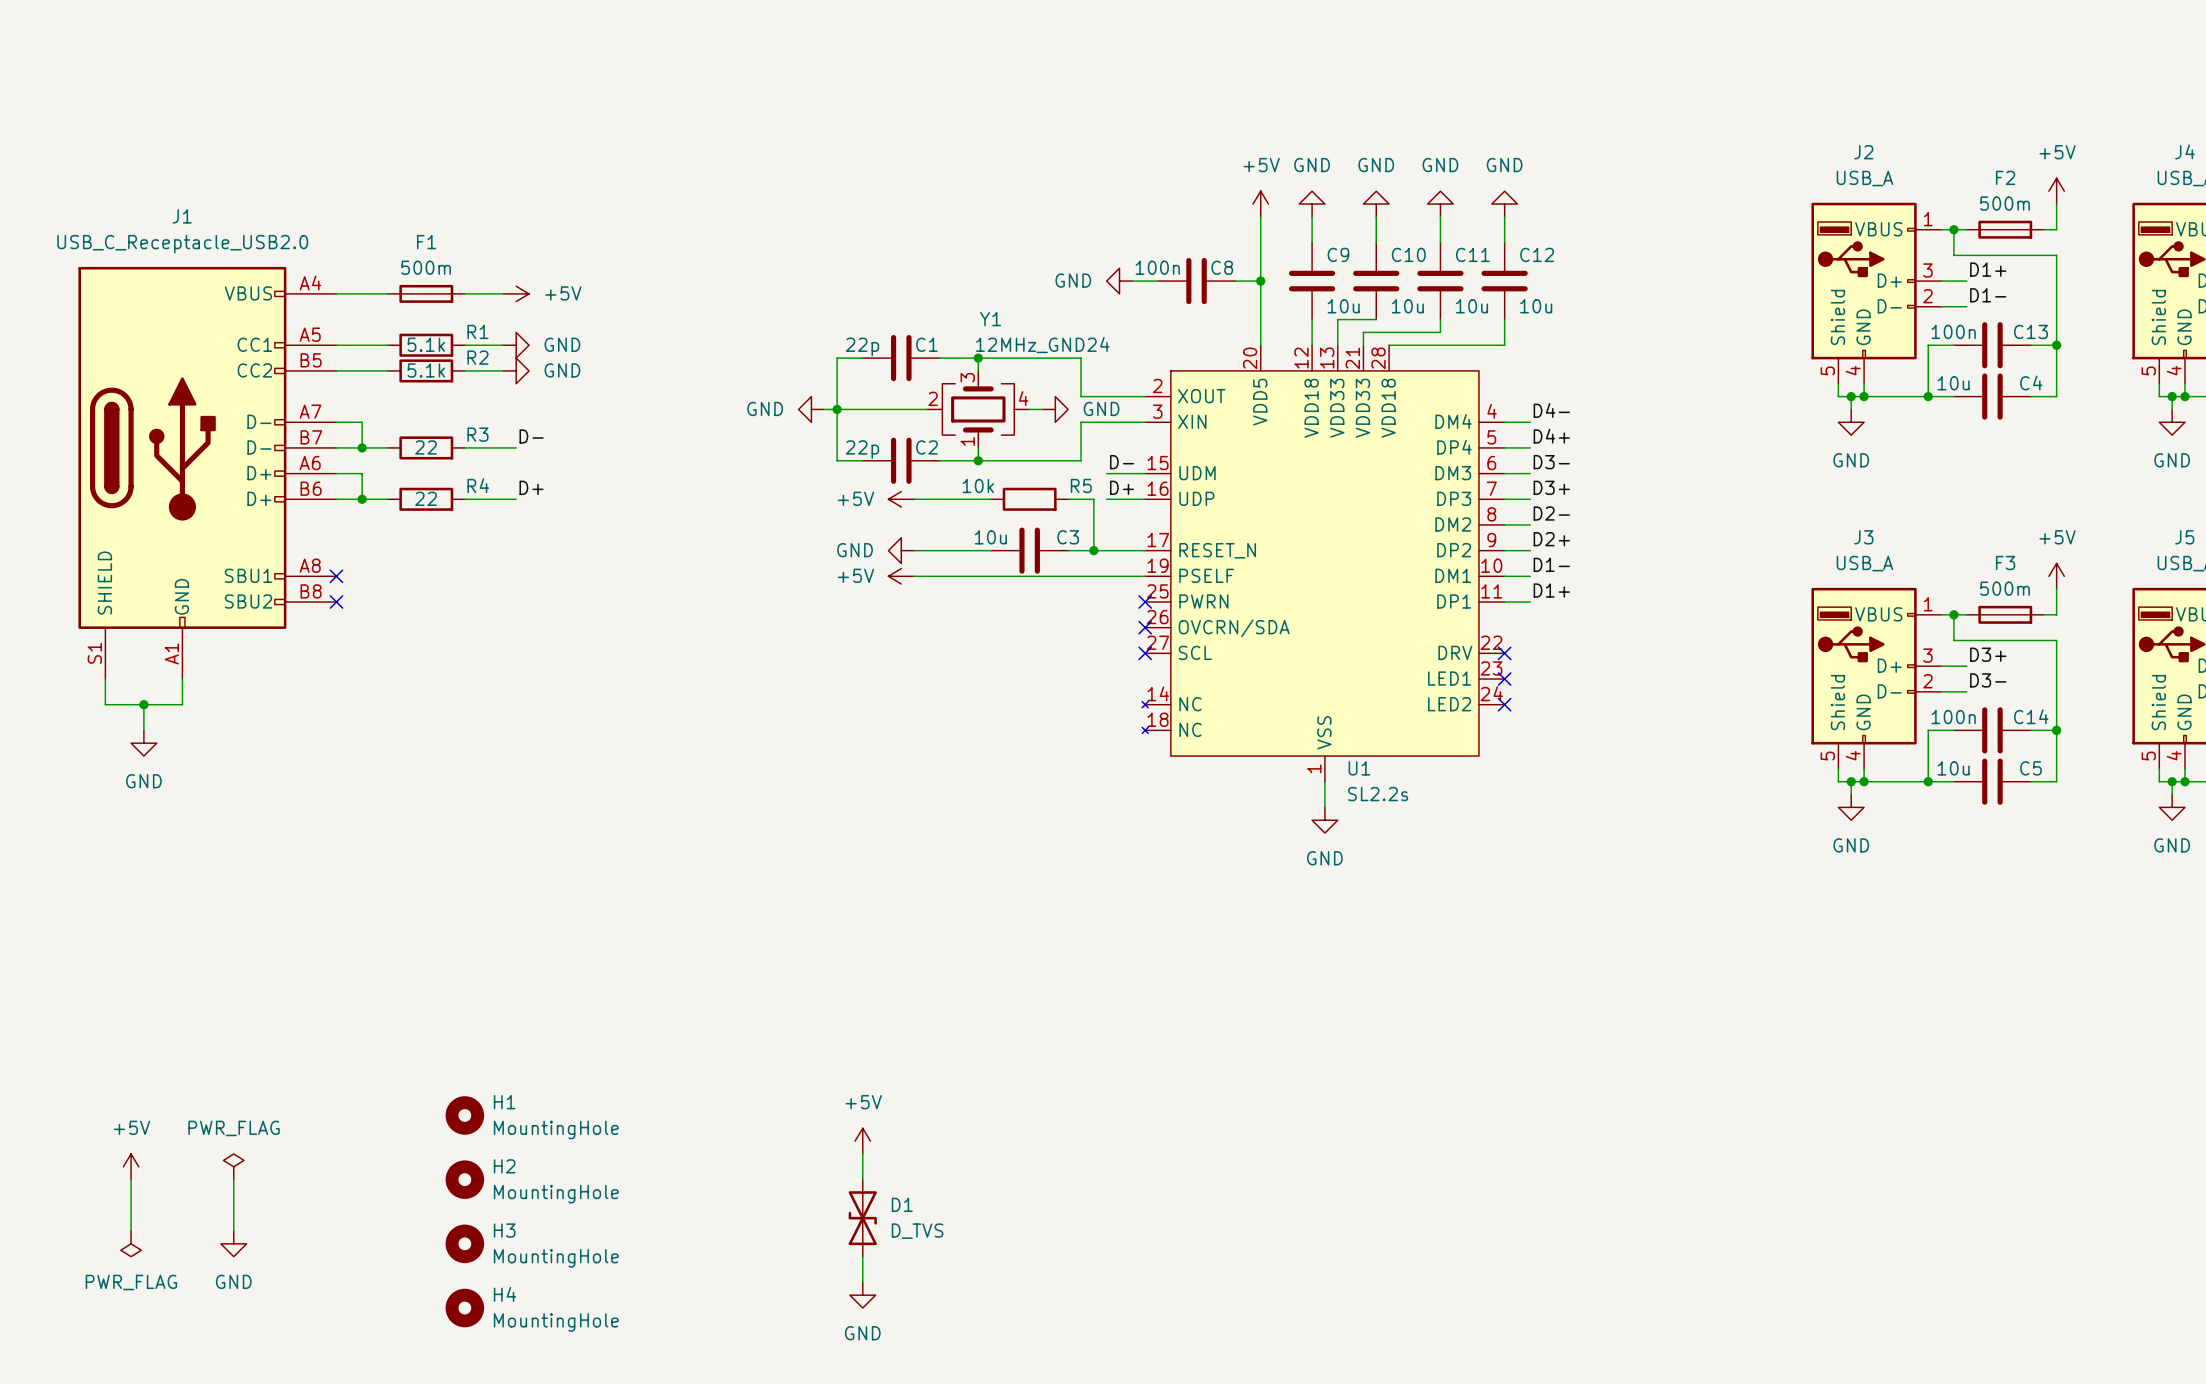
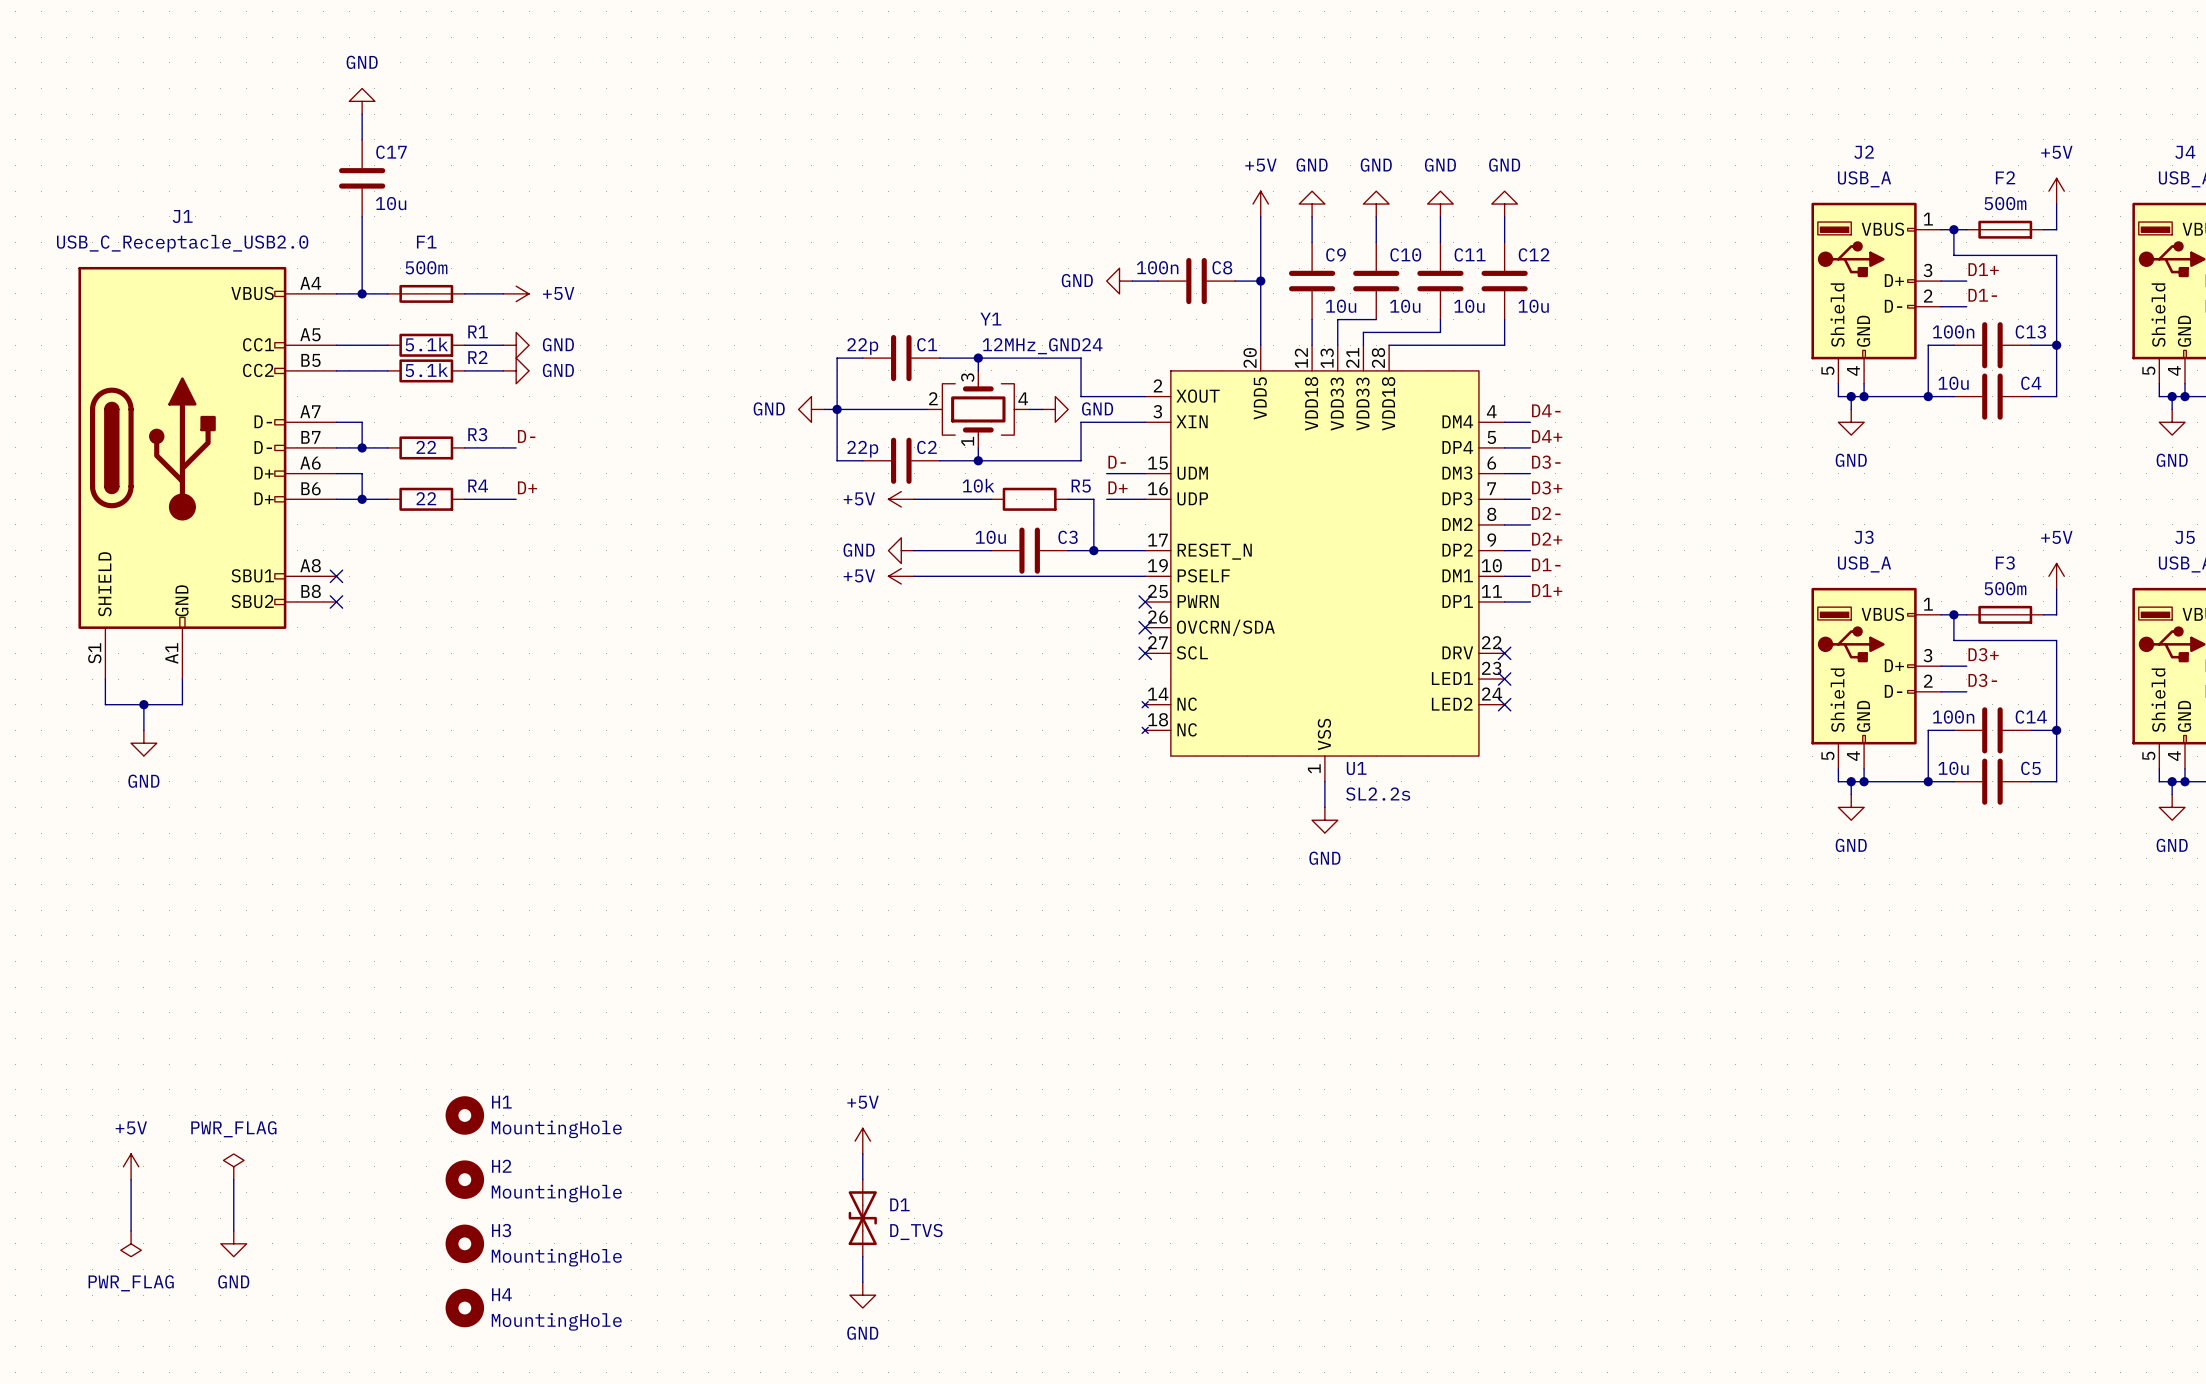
power symbol: none -> GND (362, 101)
wire: none -> (362, 114) (362, 139)
C17: none -> 10u (362, 178)
wire: none -> (362, 216) (362, 293)
junction: none -> (362, 293)

